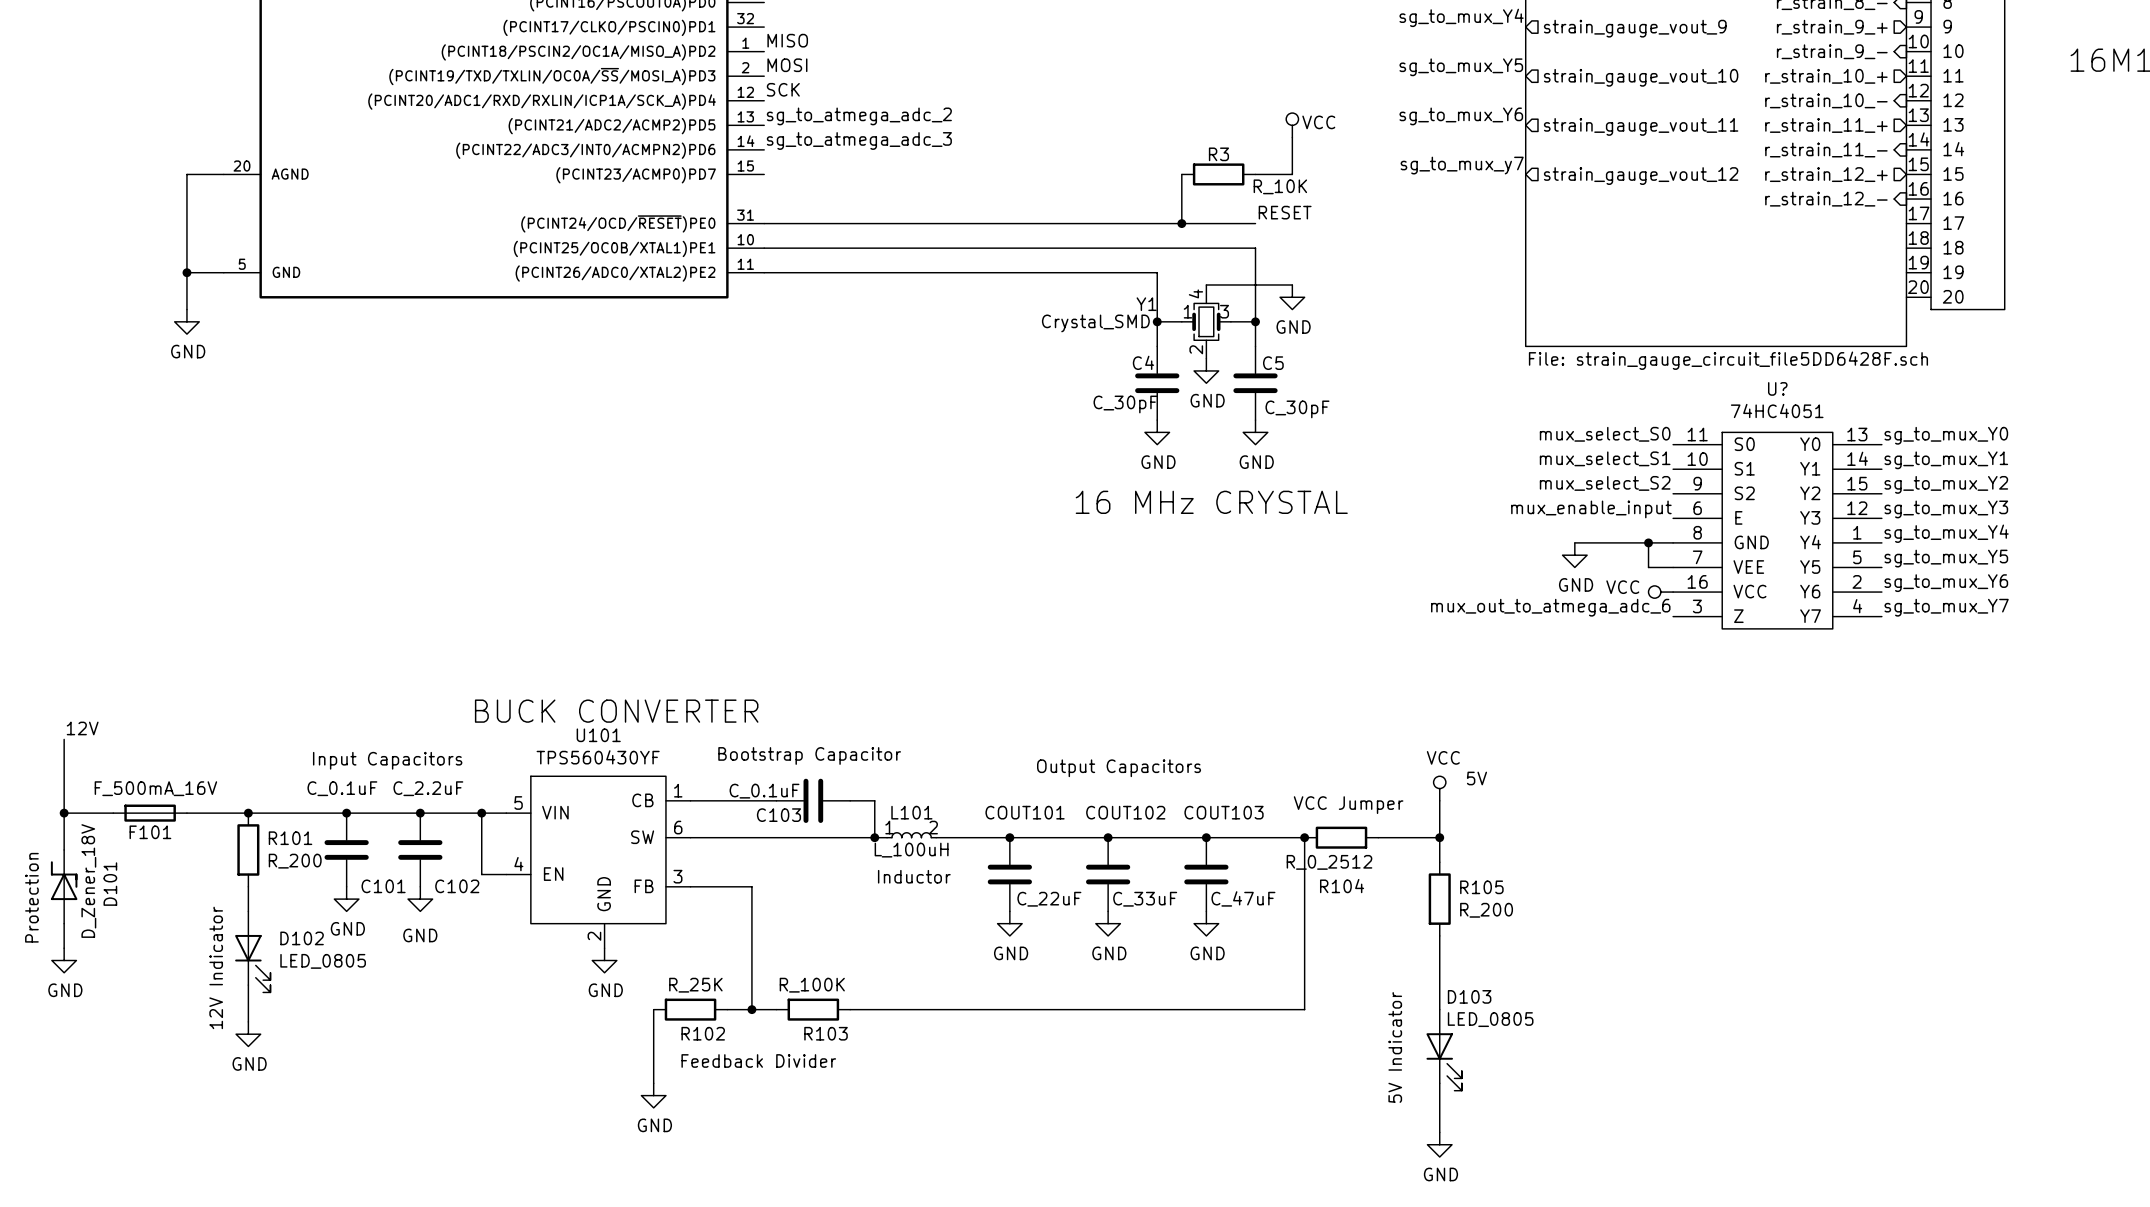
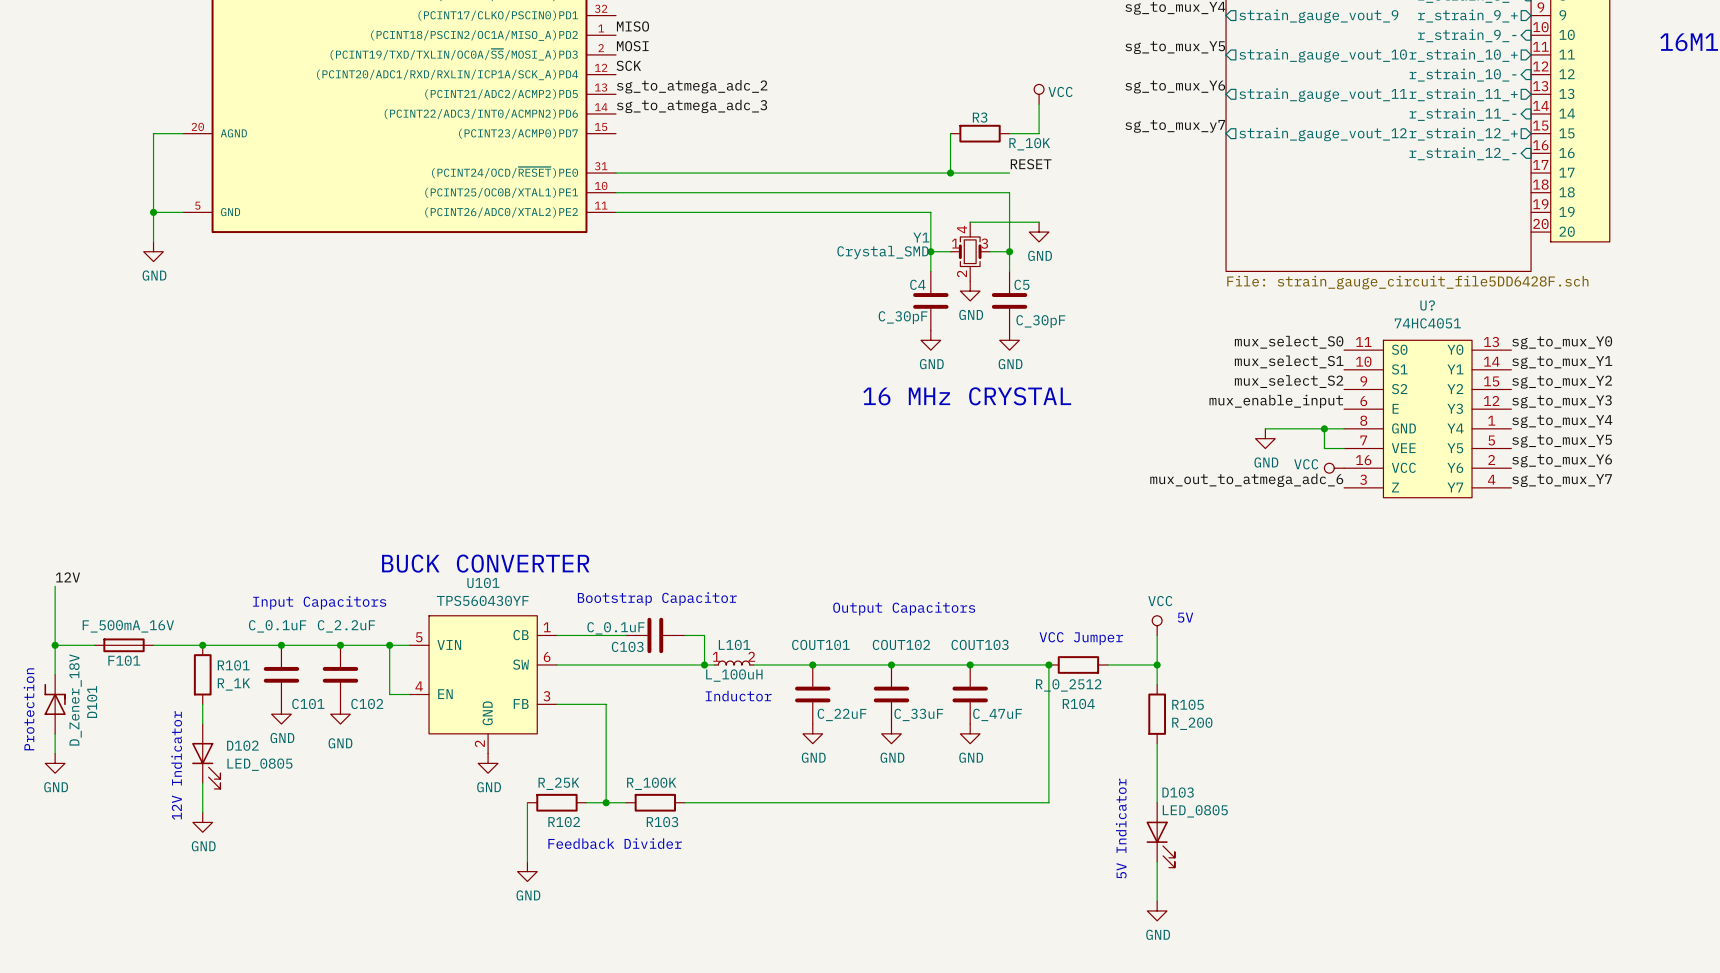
R101 value: R_200 (295, 861) -> R_1K (233, 684)

